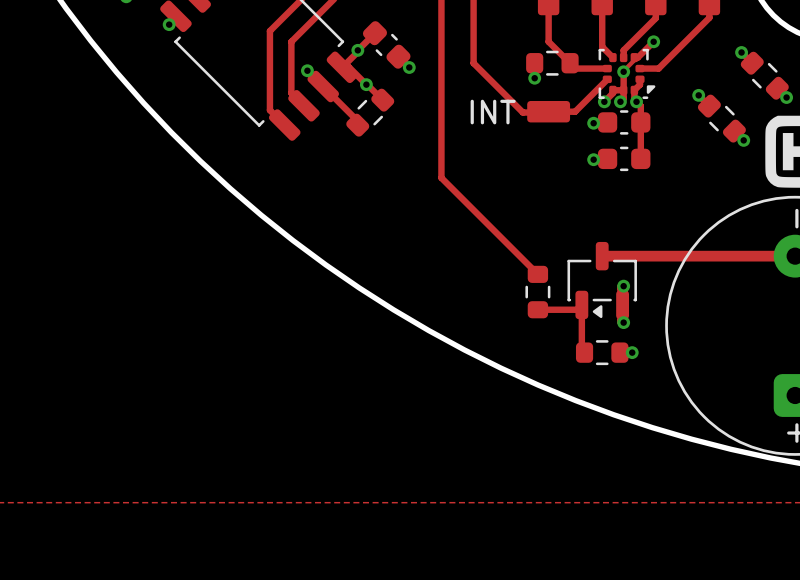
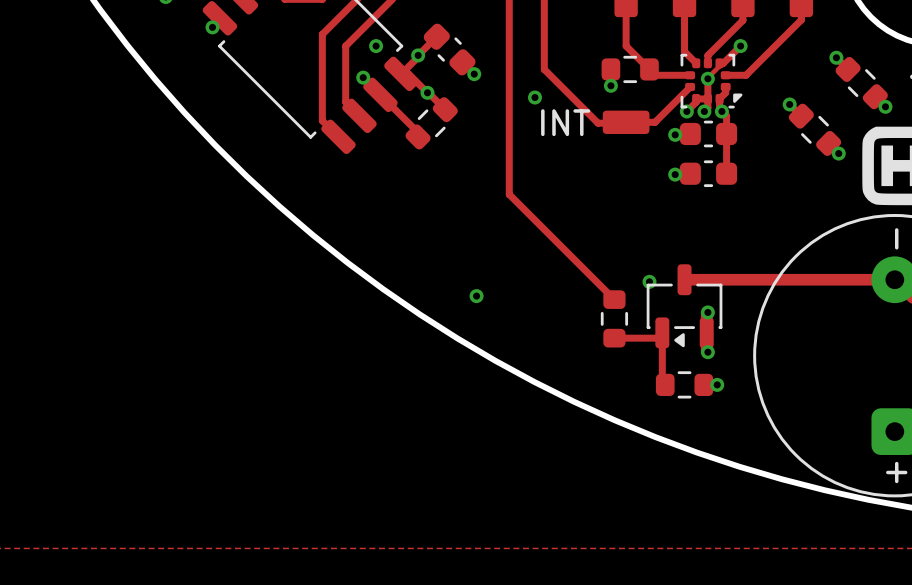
via: none -> (376, 46)
via: none -> (534, 97)
via: none -> (649, 281)
via: none -> (476, 296)

